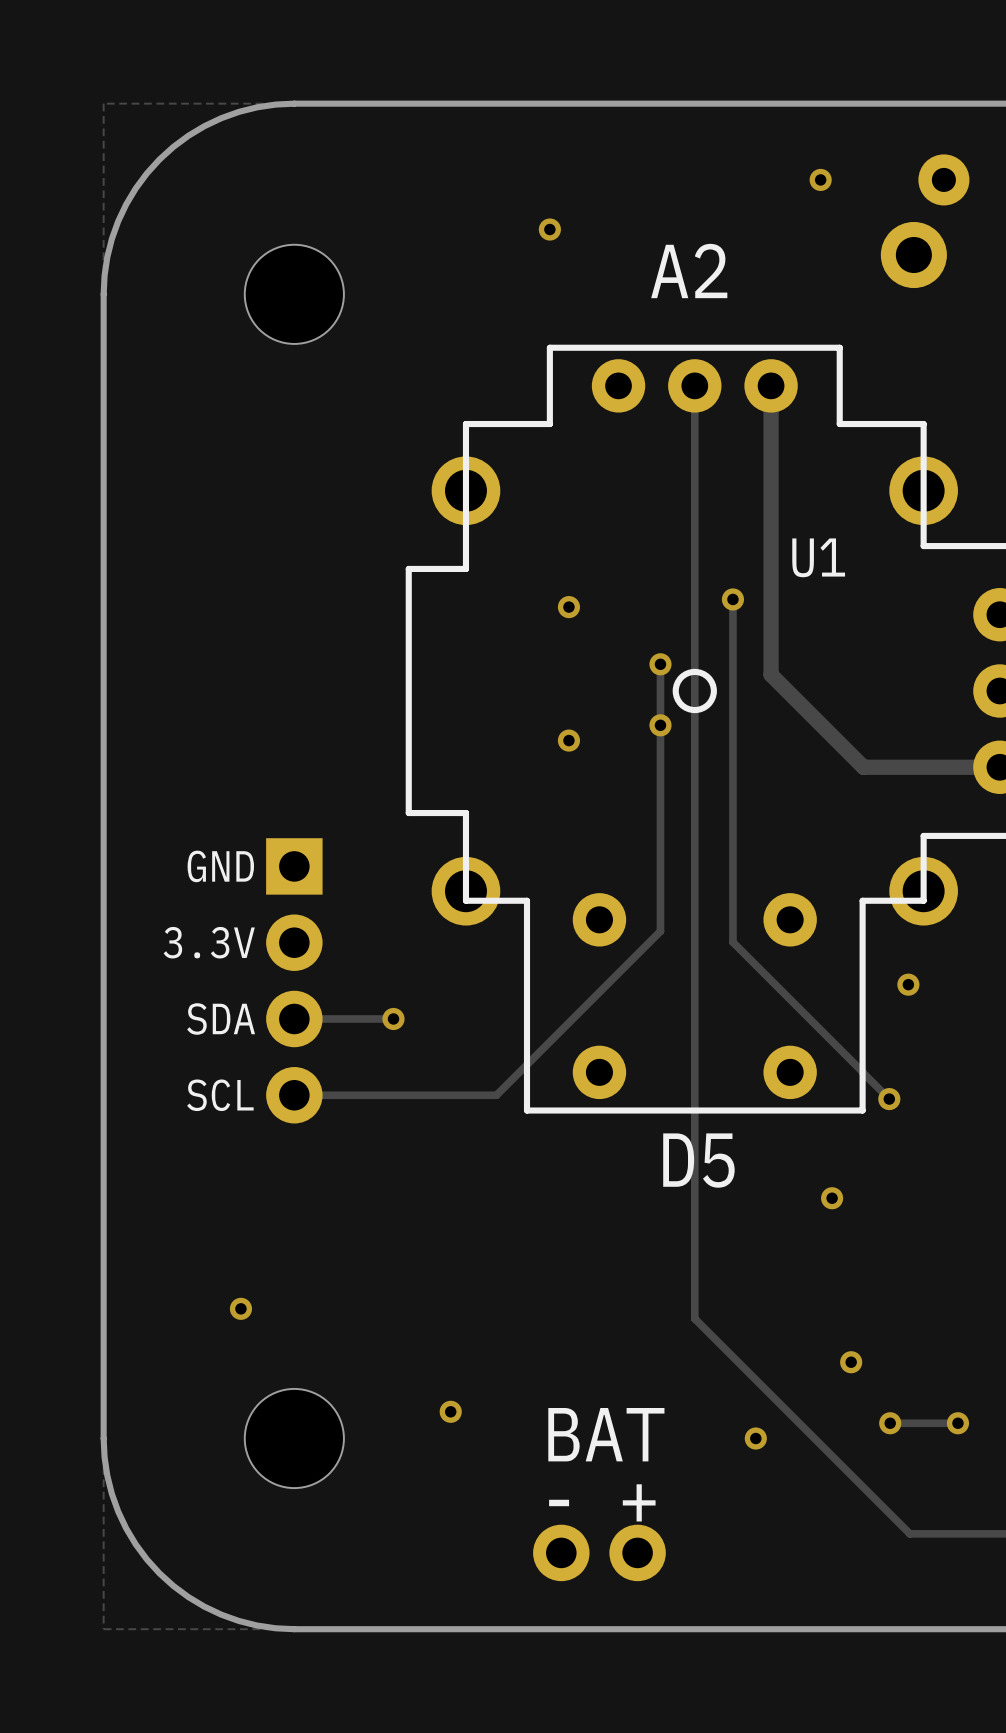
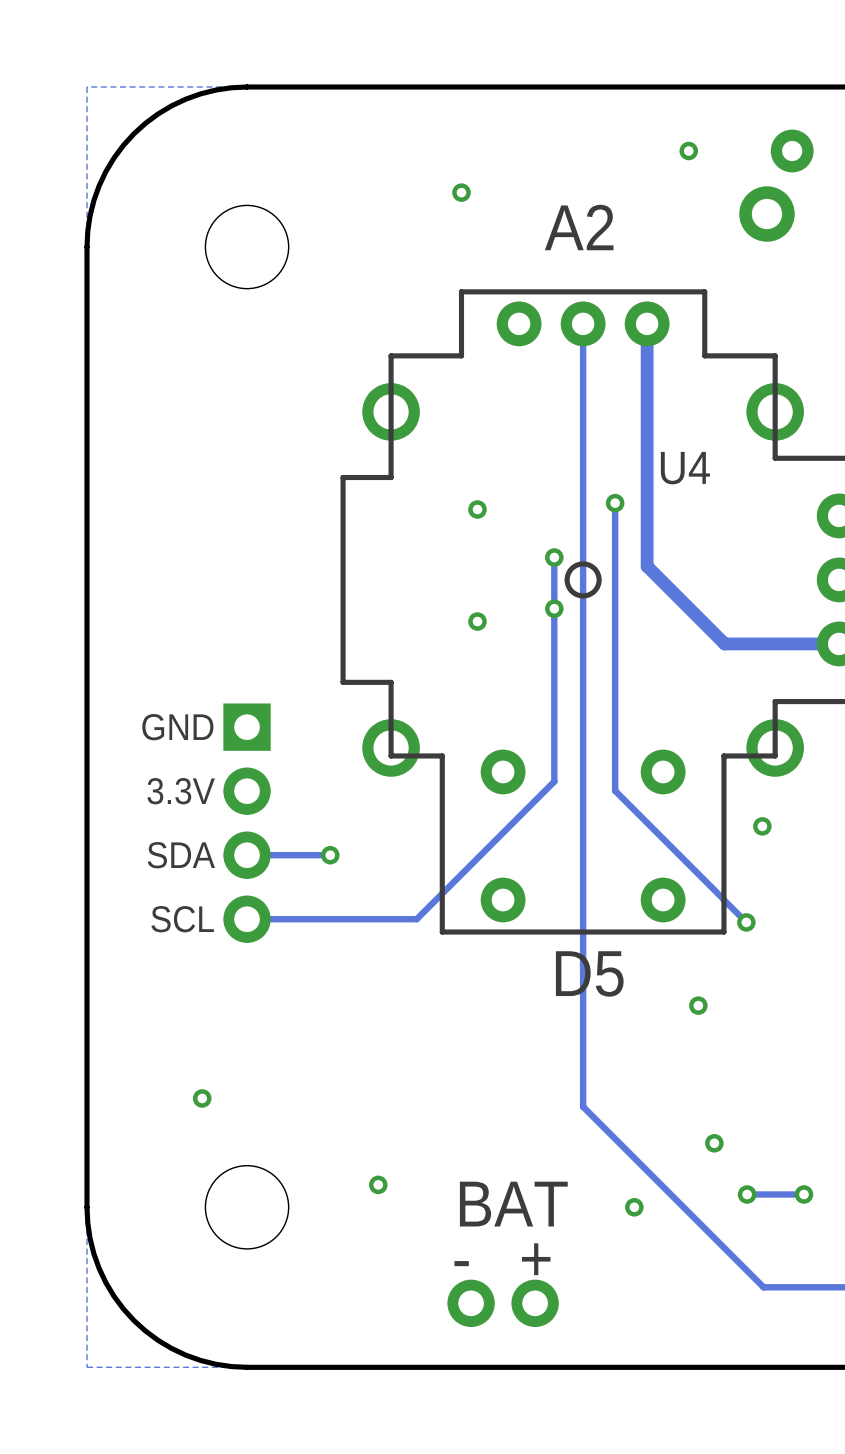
U1 name: U1 (818, 557) -> U4 (685, 468)

